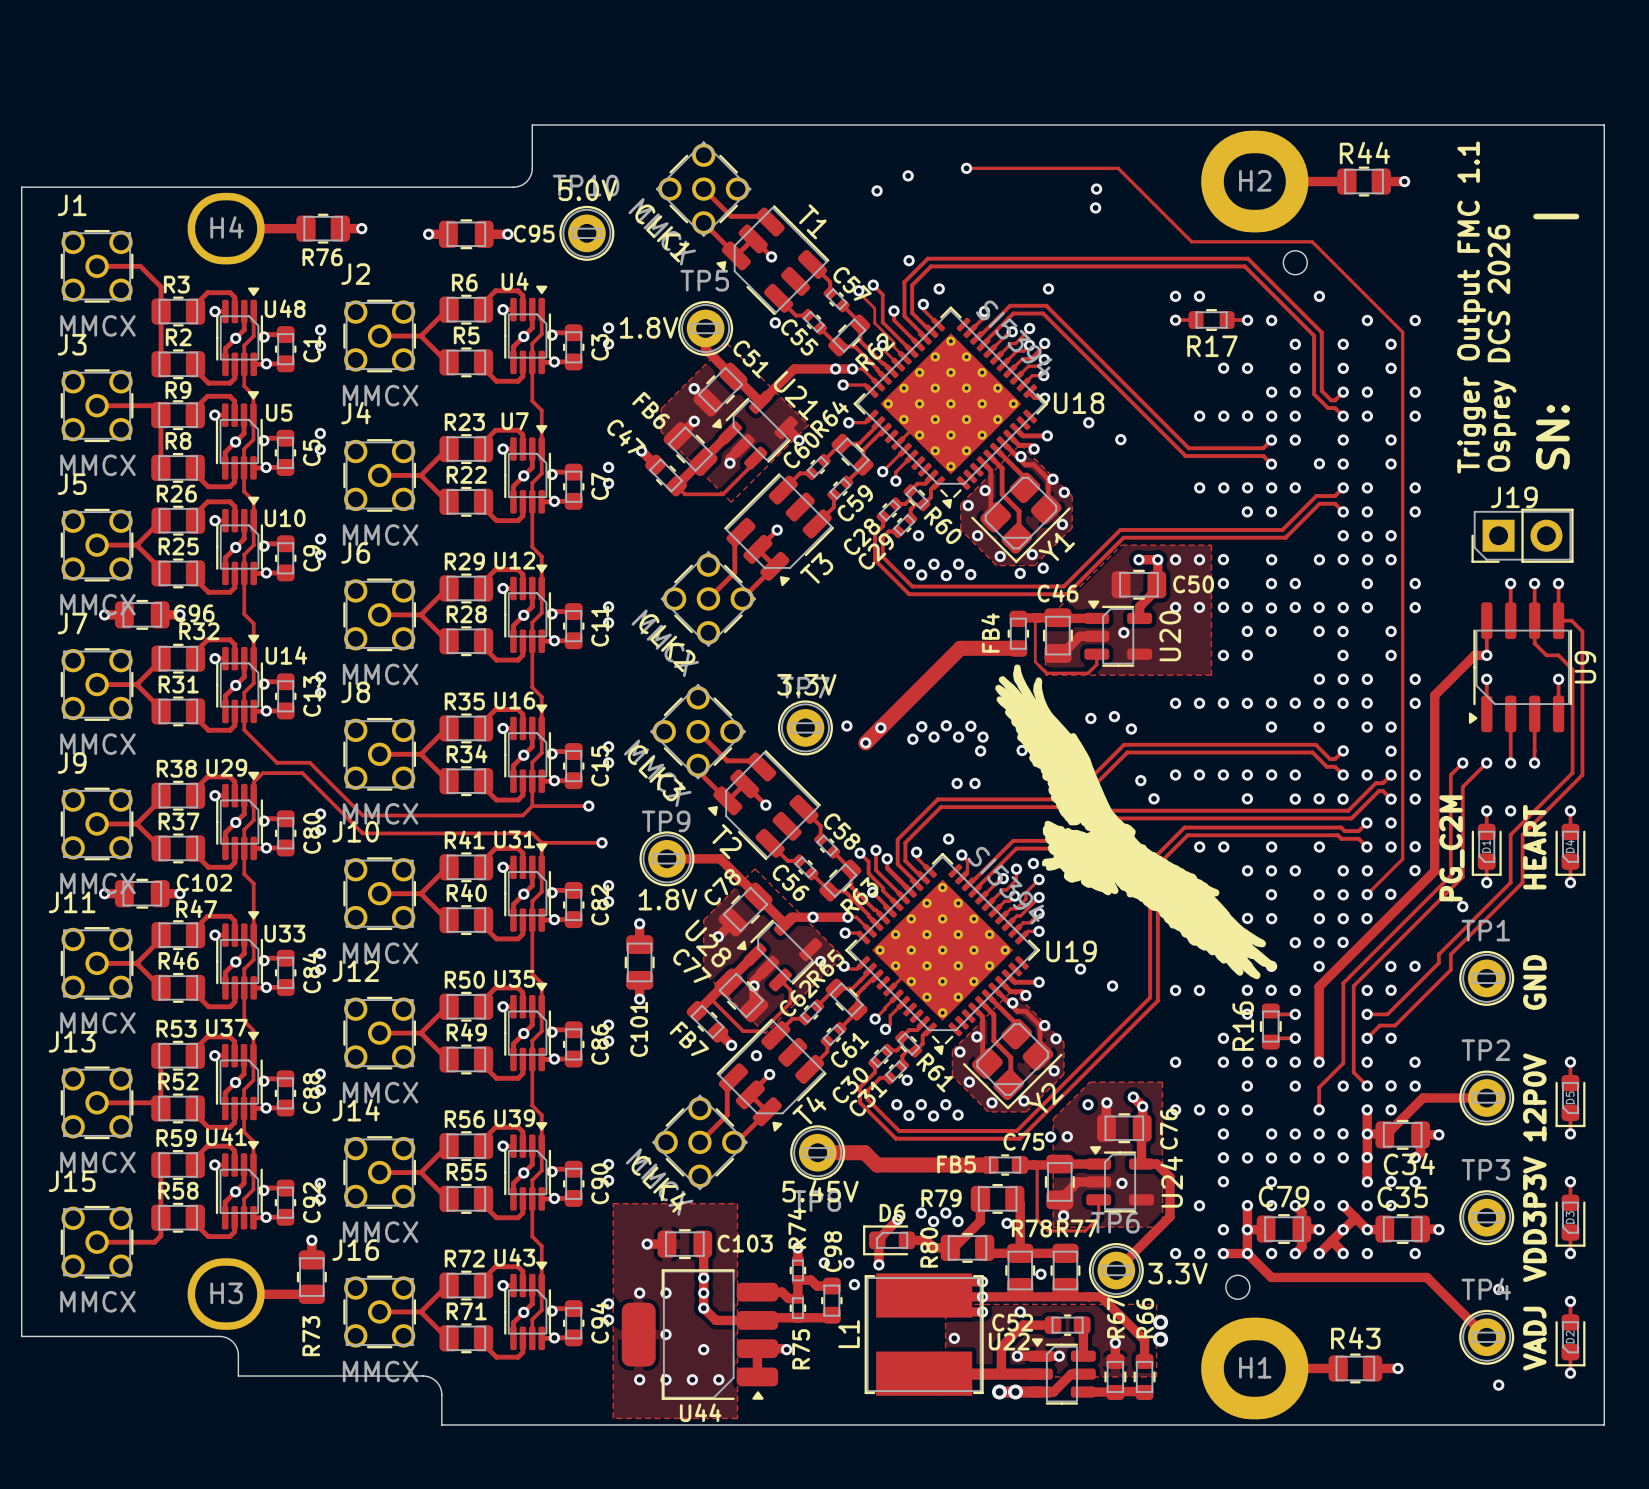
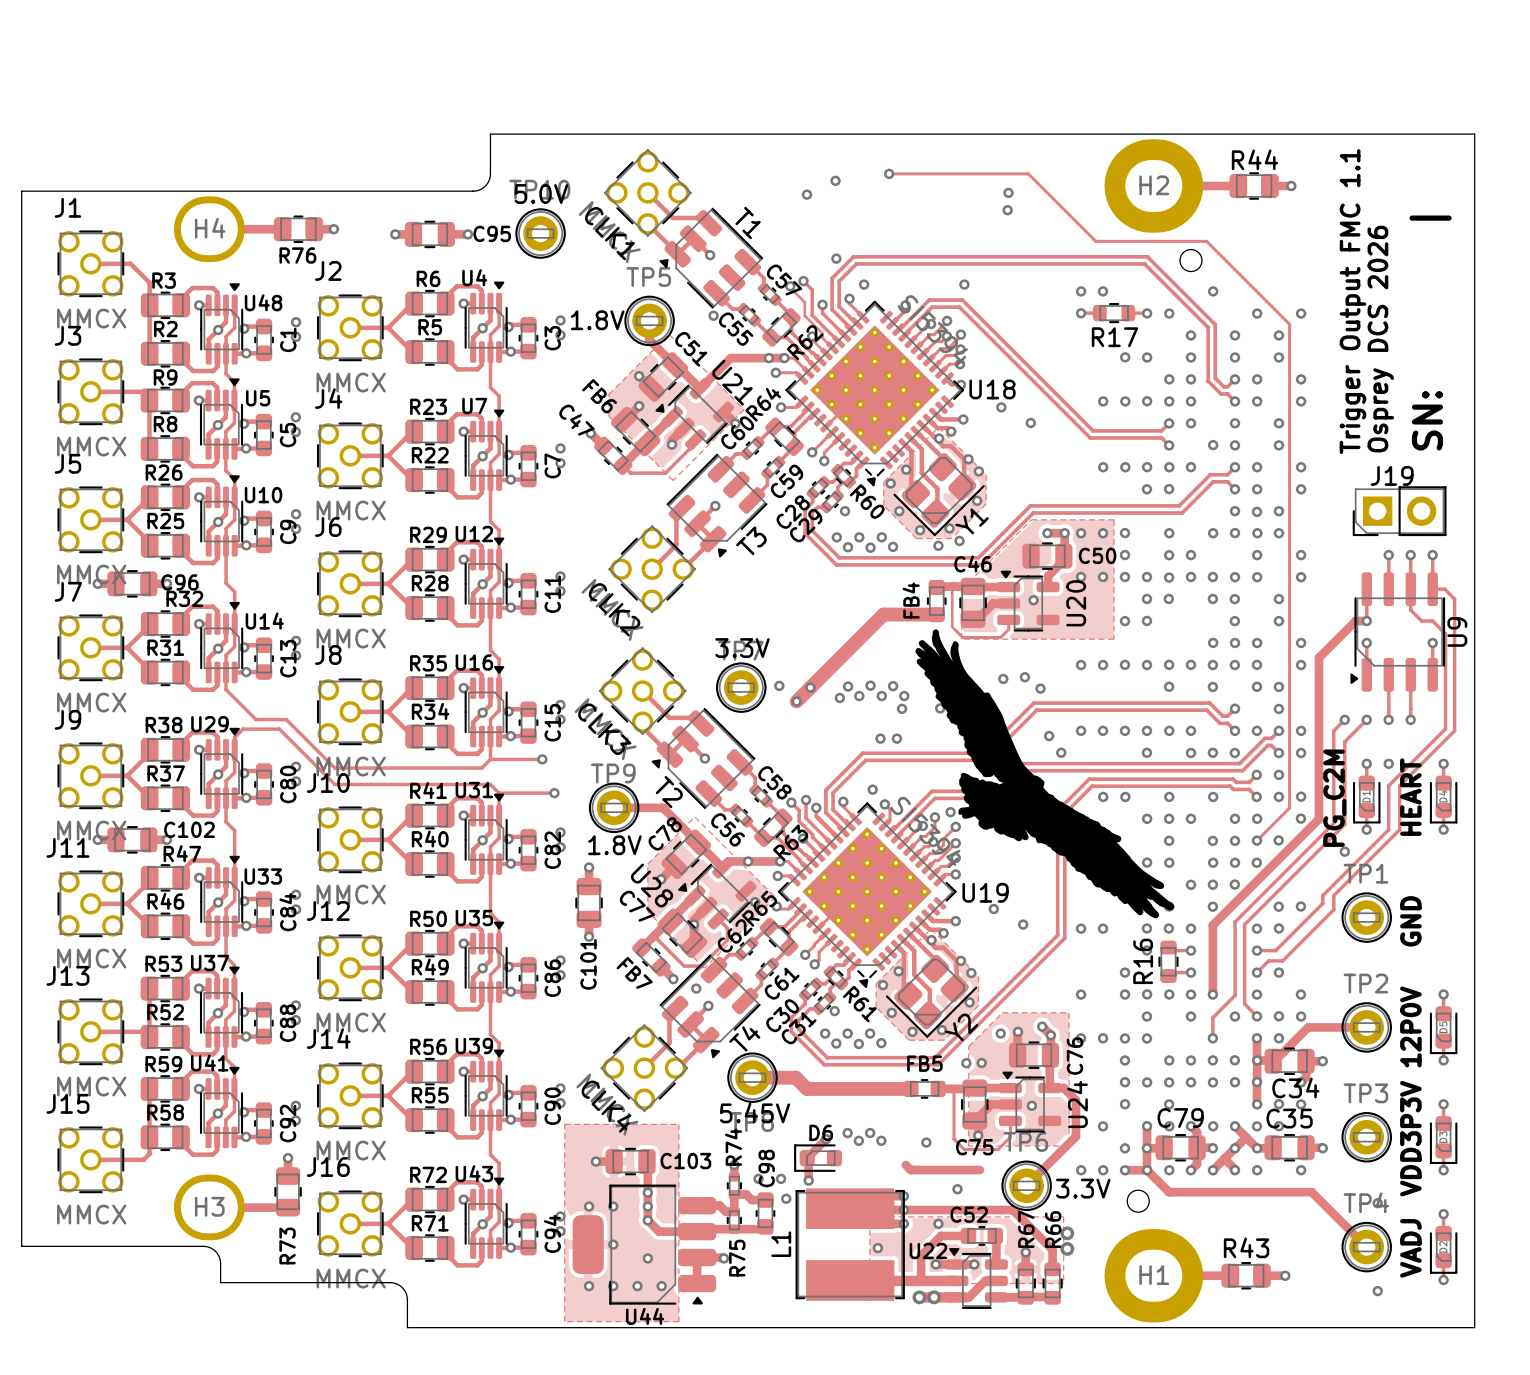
C75 name position: C75 (1024, 1141) -> C75 (974, 1147)
FB5 name position: FB5 (956, 1164) -> FB5 (924, 1063)
track: (980, 1198) (980, 1221) (953, 1247) (933, 1247) (926, 1240) (906, 1240) -> none
R79: (997, 1198) -> none
track: (1014, 1198) (1020, 1204) (1020, 1253) -> none
R80: (967, 1247) -> none
R78: (1020, 1270) -> none
R77: (1065, 1270) -> none
C52 name position: C52 (1012, 1322) -> C52 (969, 1214)

